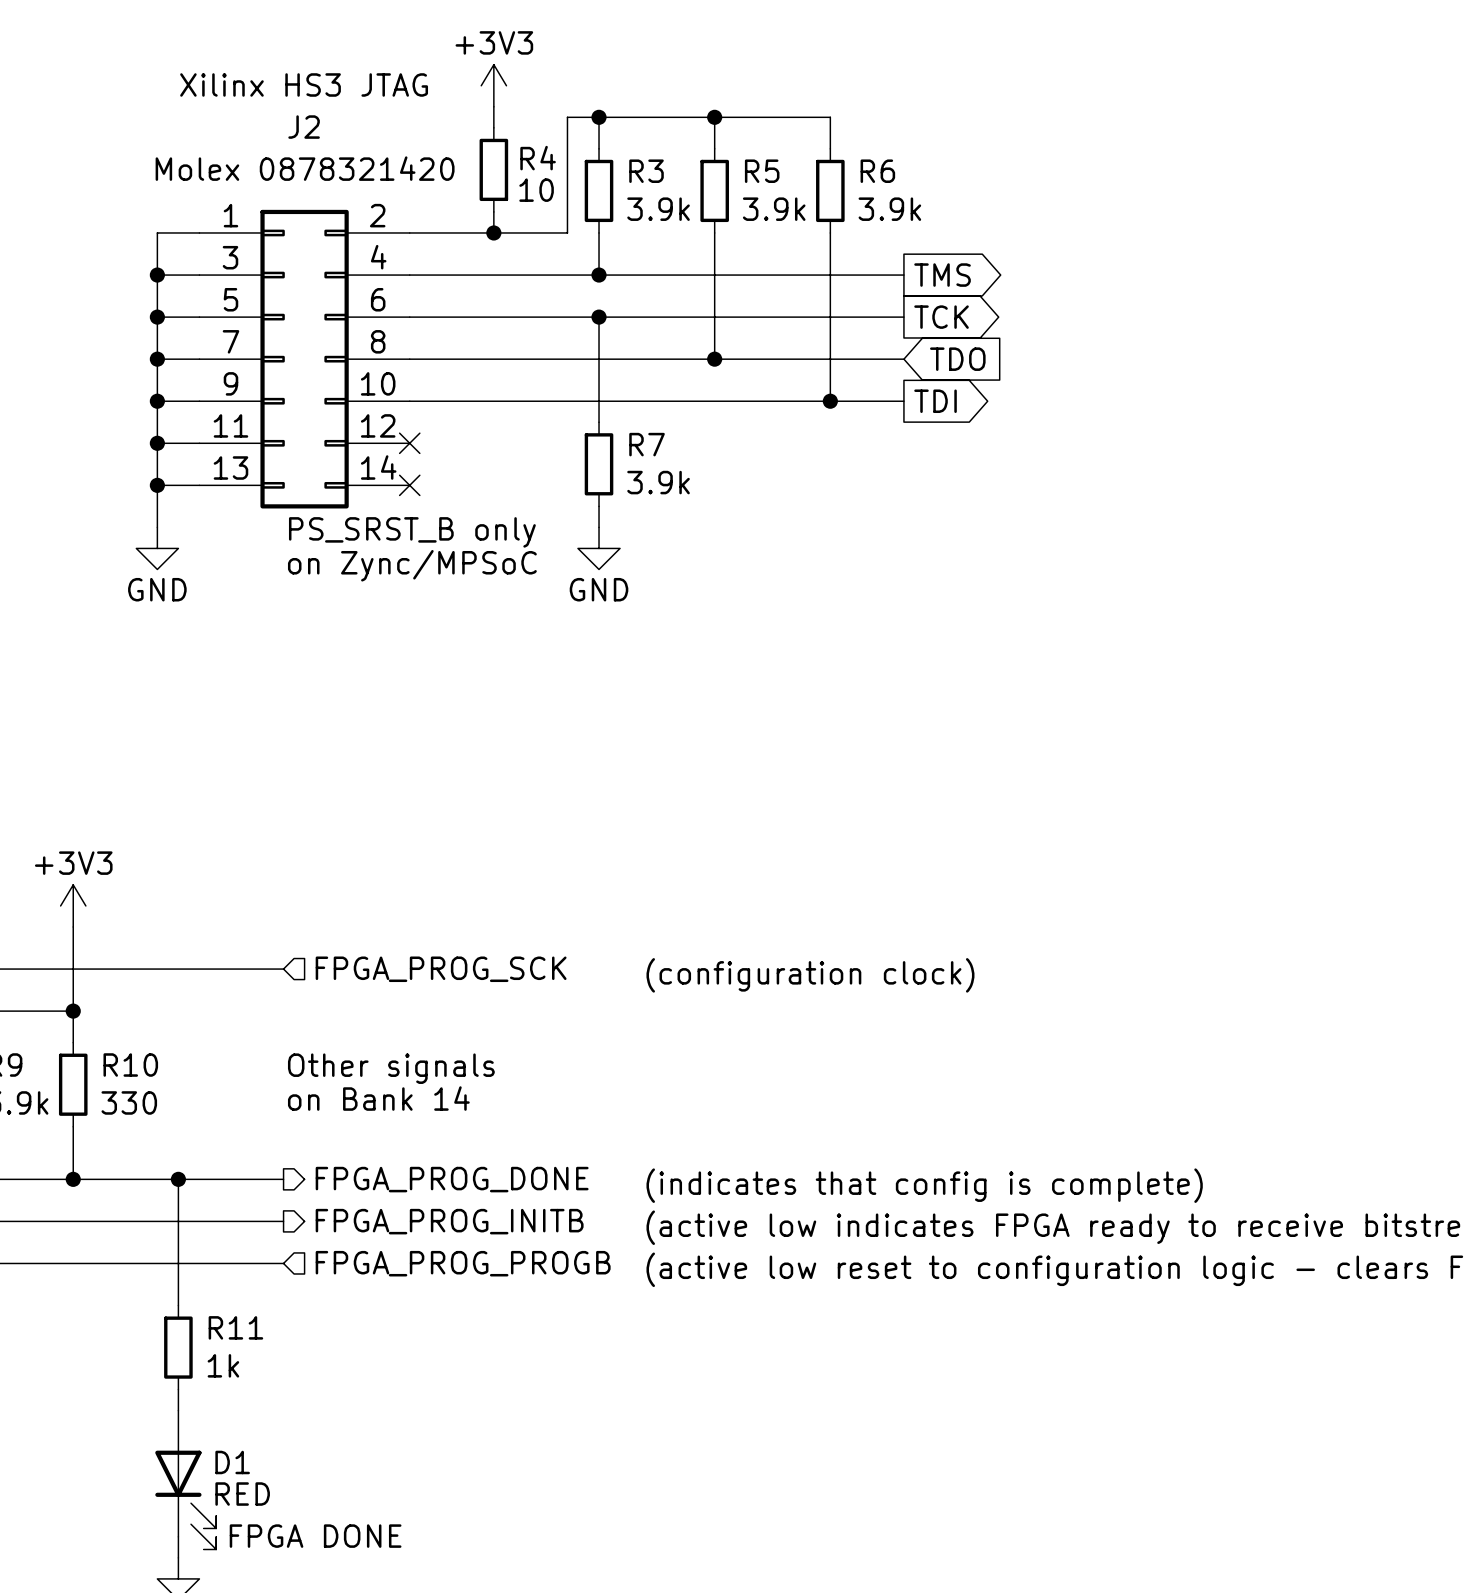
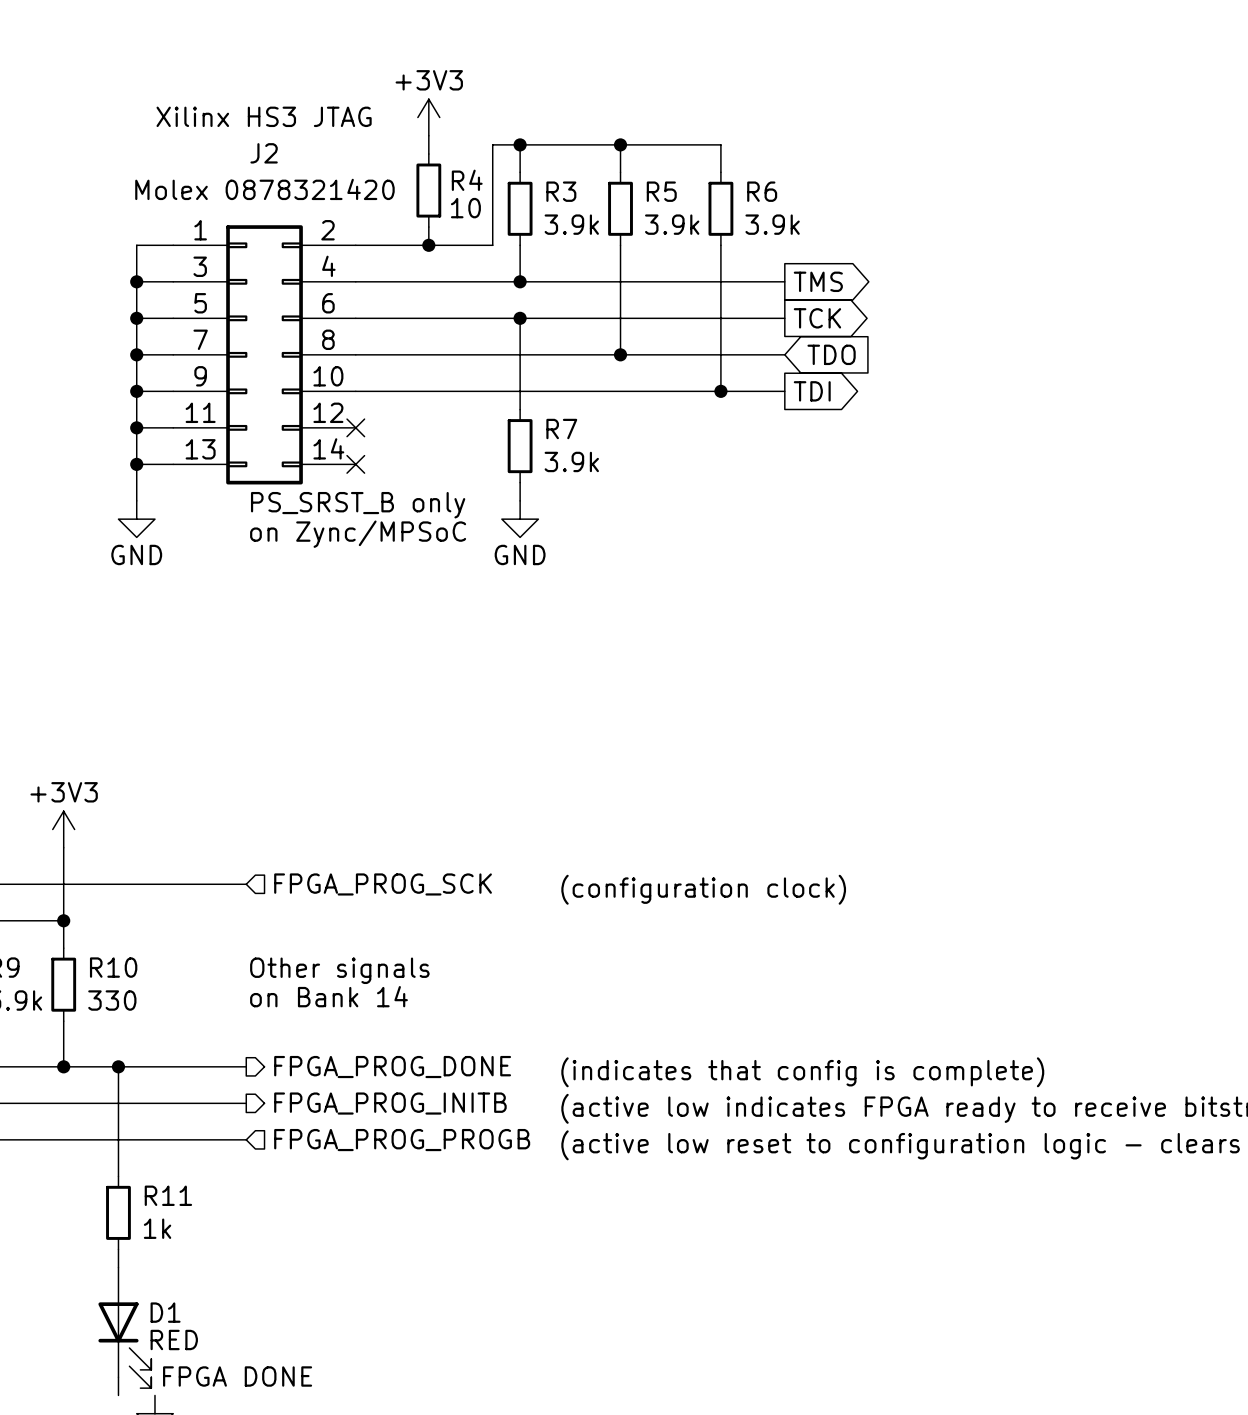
wire: (178, 1179) (178, 1305) -> (118, 1066) (118, 1176)
junction position: (178, 1179) -> (118, 1066)
R11 position: (178, 1347) -> (118, 1212)
wire: (178, 1389) (178, 1410) -> (118, 1249) (118, 1267)
D1 position: (185, 1480) -> (124, 1327)
wire: (178, 1536) (178, 1557) -> (118, 1377) (118, 1395)

